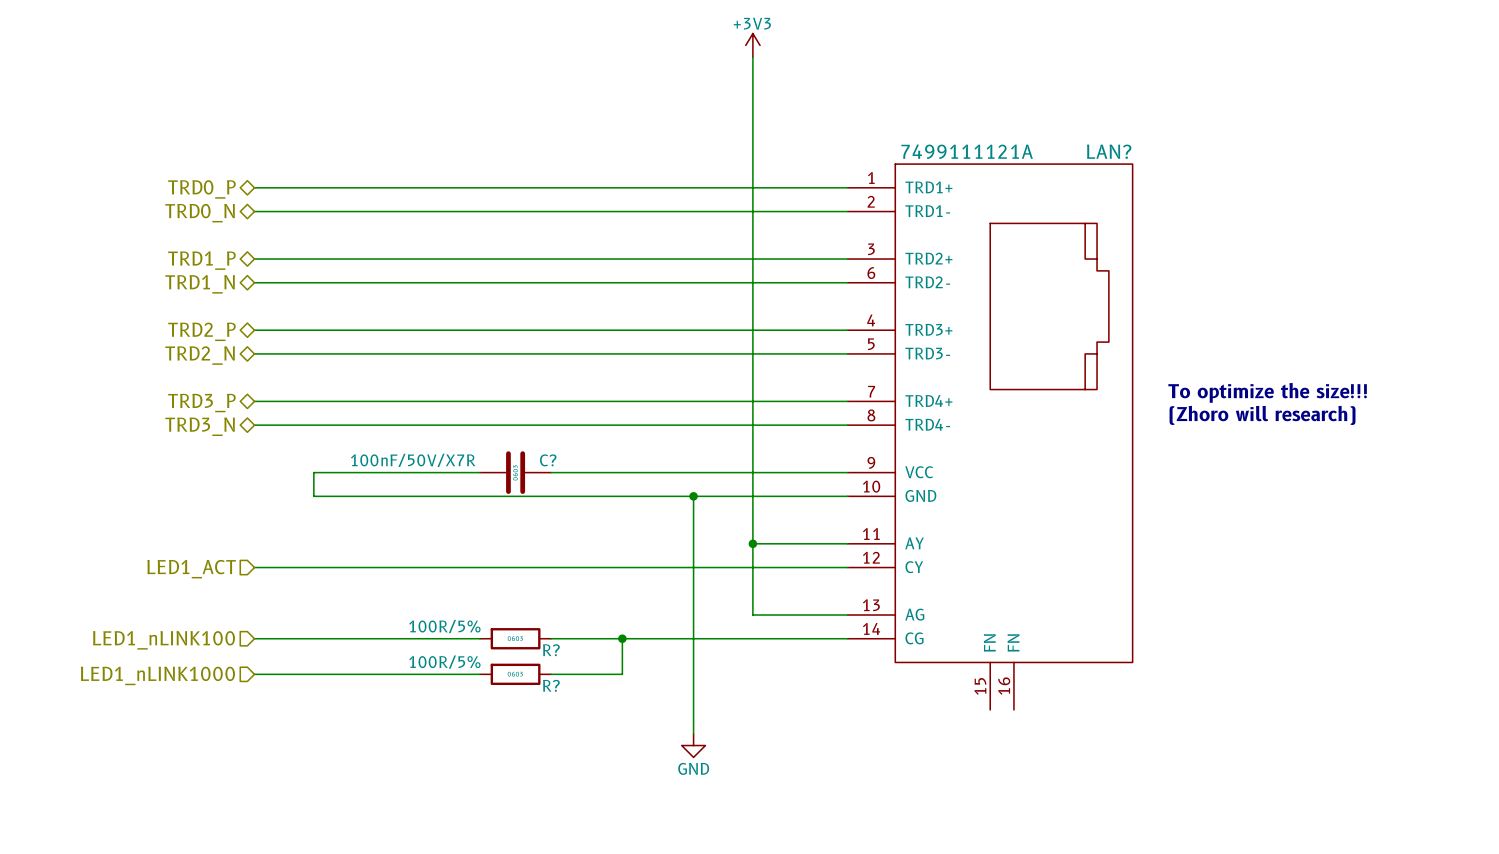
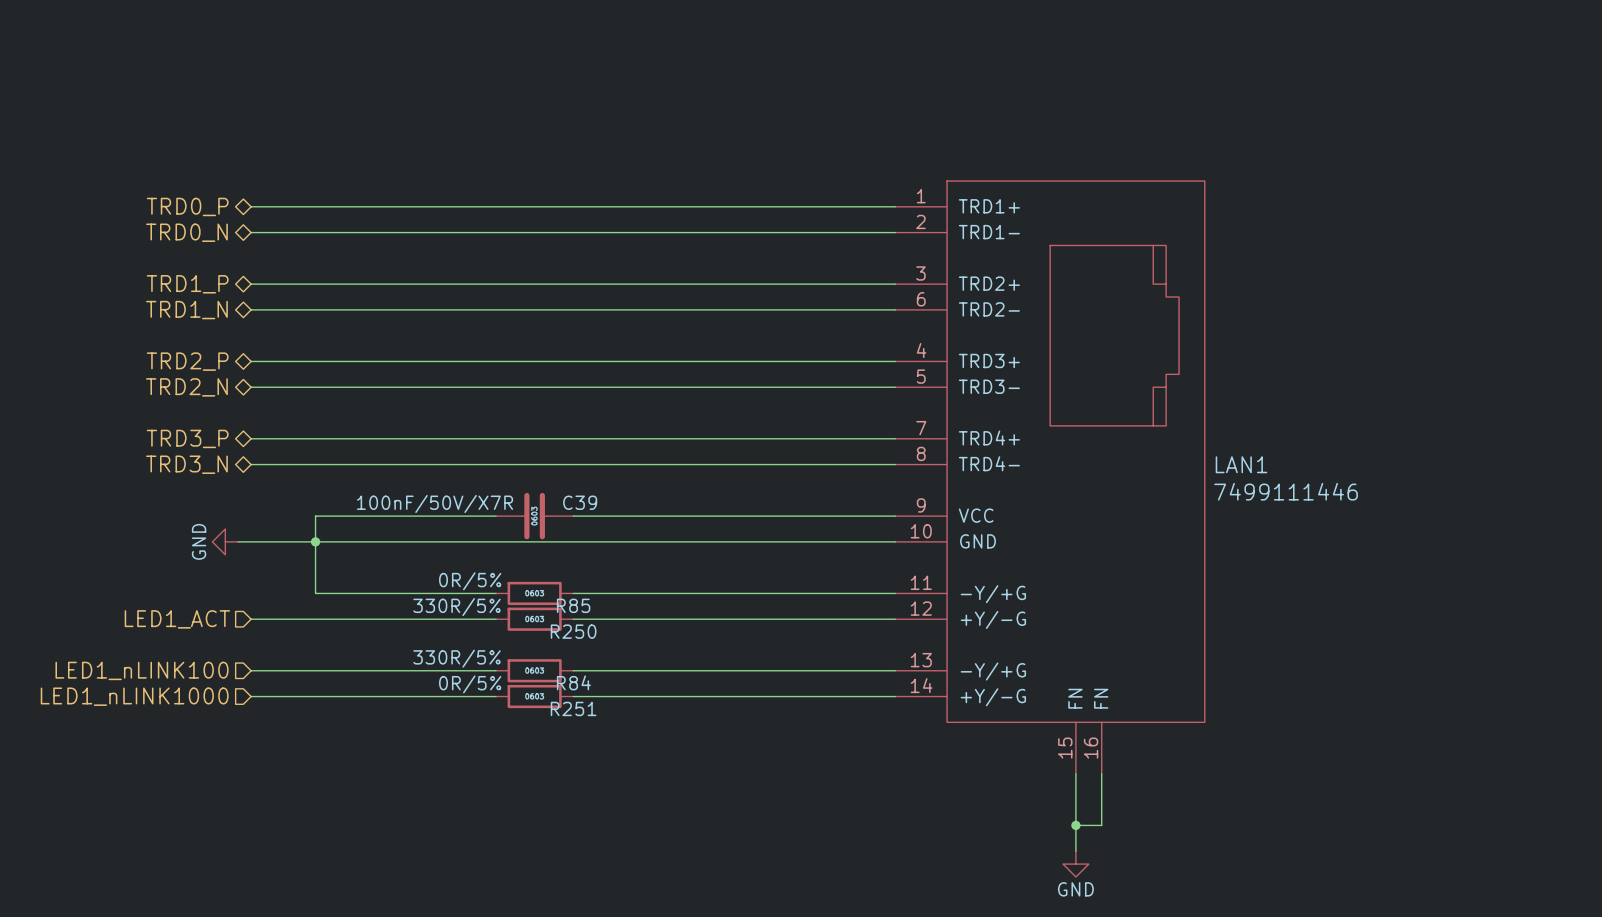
power symbol: +3V3 (752, 45) -> none
wire: (752, 57) (752, 615) -> (573, 670) (792, 670)
text: To optimize the size!!! (1267, 392) -> none
text: (Zhoro will research) (1262, 415) -> none
LAN?: 7499111121A (990, 437) -> none
LAN1: none -> 7499111446 (1050, 477)
C? name: C? (548, 460) -> C39 (580, 502)
power symbol: none -> GND (225, 541)
wire: none -> (238, 541) (315, 541) (315, 593) (495, 593)
junction: none -> (315, 541)
wire: (693, 496) (693, 733) -> none
junction: (693, 496) -> none
R85: none -> 0R/5% (534, 593)
wire: none -> (573, 593) (792, 593)
junction: (752, 543) -> none
wire: (479, 567) (551, 567) -> none
R250: none -> 330R/5% (534, 619)
R84: none -> 330R/5% (534, 670)
hierarchical label: none -> LED1_nLINK100 (142, 670)
R? value: 100R/5% (444, 626) -> 0R/5% (470, 684)
wire: (622, 638) (622, 674) (551, 674) -> none
junction: (622, 638) -> none
hierarchical label: LED1_nLINK100 (163, 640) -> LED1_nLINK1000 (134, 696)
R? name: R? (551, 650) -> R251 (573, 708)
wire: (254, 674) (479, 674) -> (251, 670) (495, 670)
R?: 100R/5% (515, 674) -> none
hierarchical label: LED1_nLINK1000 (157, 675) -> none
wire: none -> (1075, 773) (1075, 851)
wire: none -> (1101, 773) (1101, 825) (1075, 825)
power symbol: GND (693, 745) -> none
junction: none -> (1075, 825)
power symbol: none -> GND (1075, 864)

